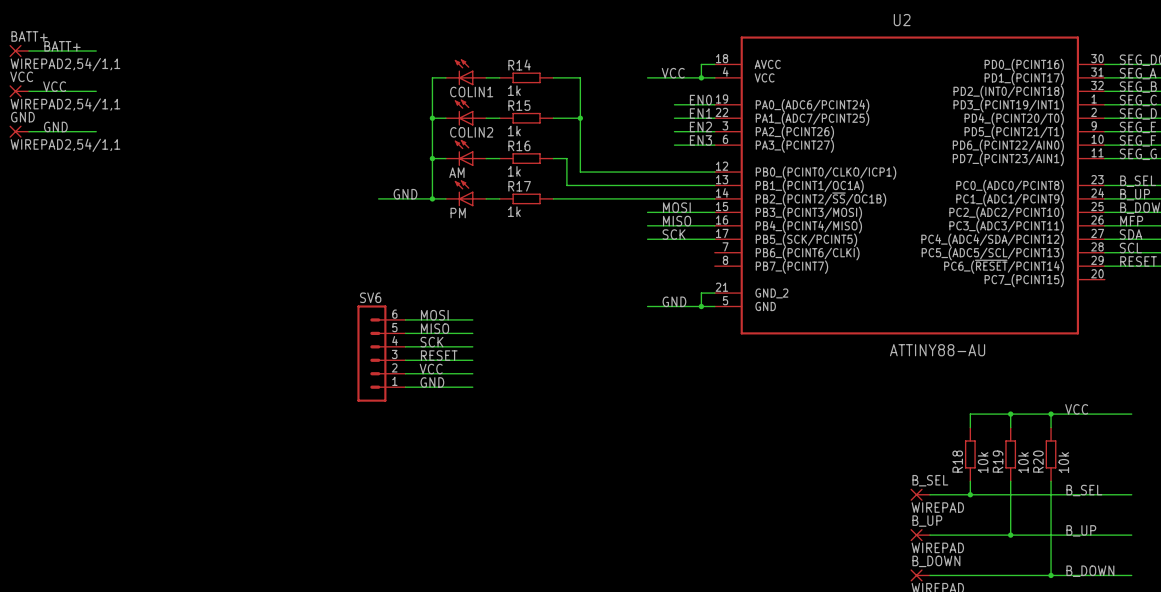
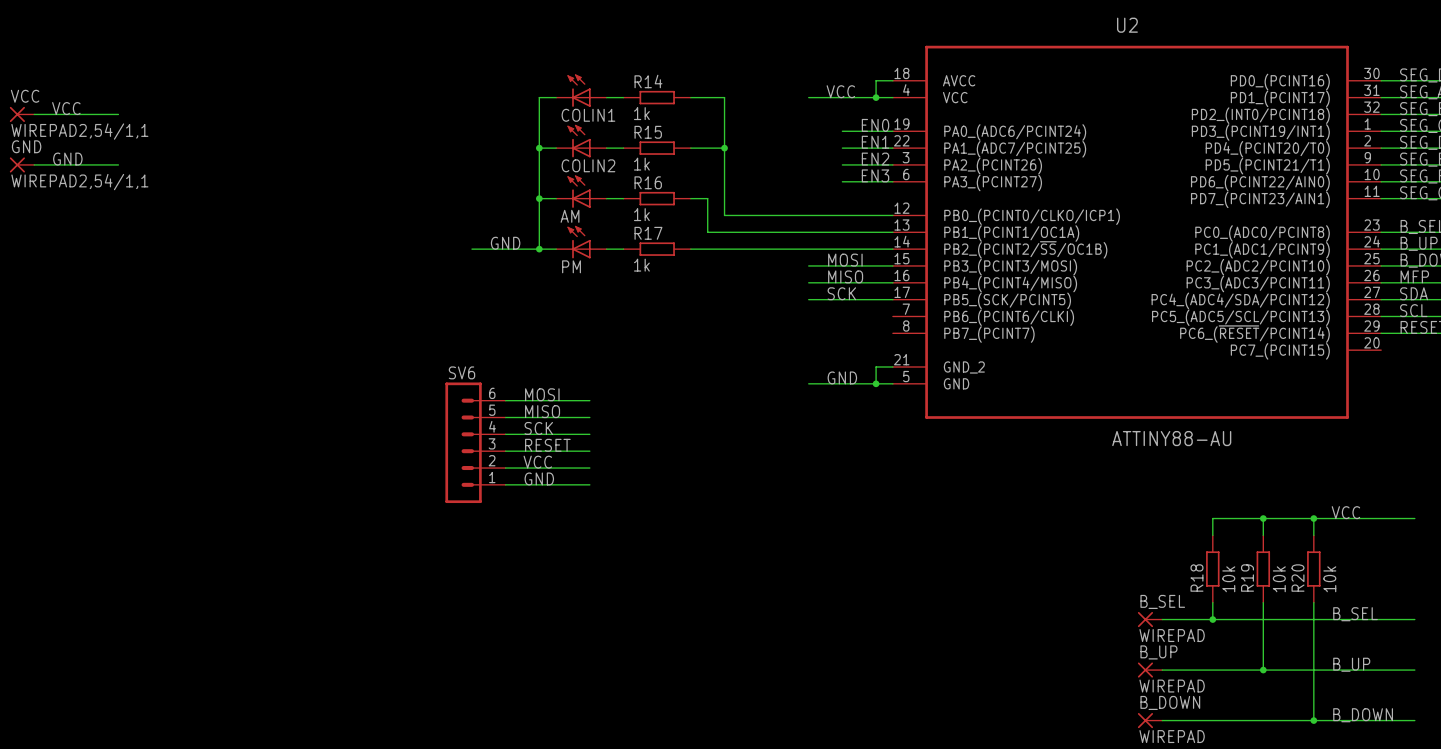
label: BATT+ (62, 46) -> none
BATT+: WIREPAD2,54/1,1 (19, 50) -> none
wire: (29, 50) (96, 50) -> none

